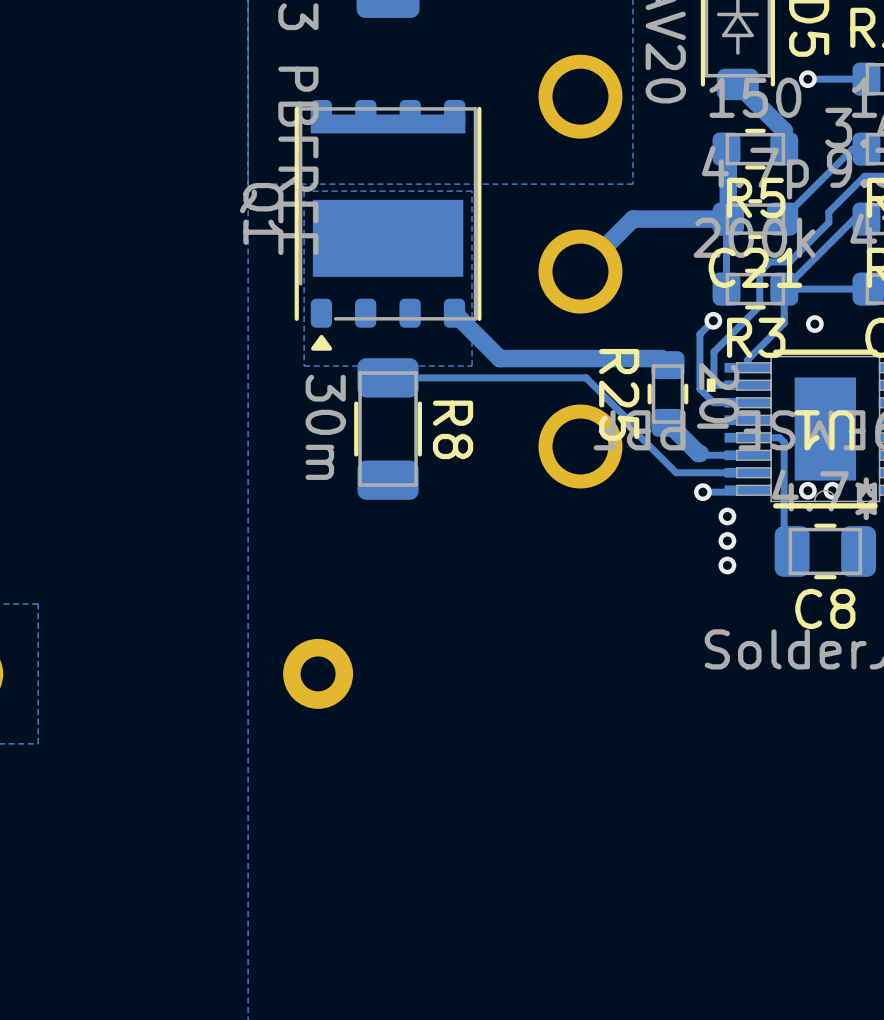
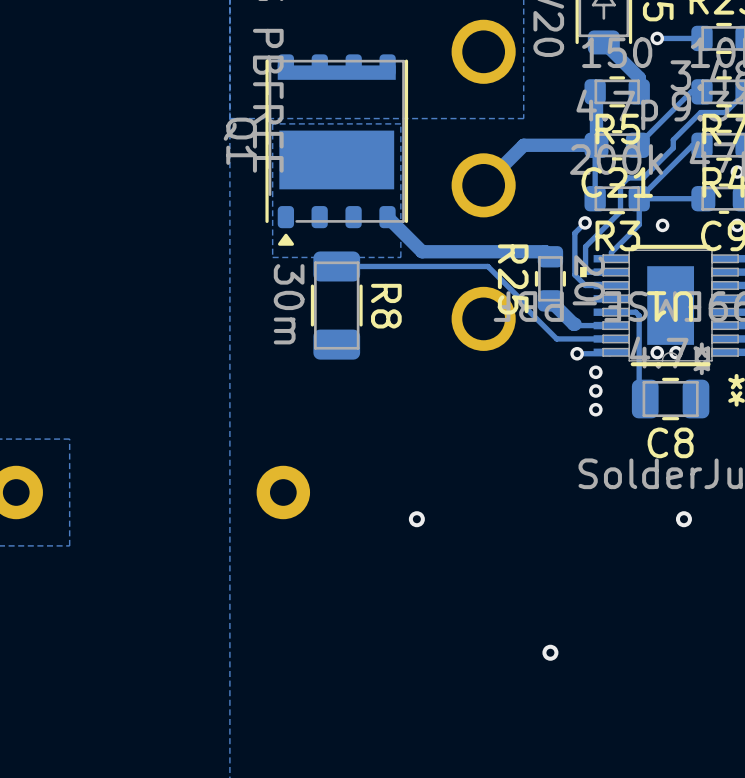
via: none -> (416, 519)
via: none -> (683, 519)
via: none -> (550, 652)

